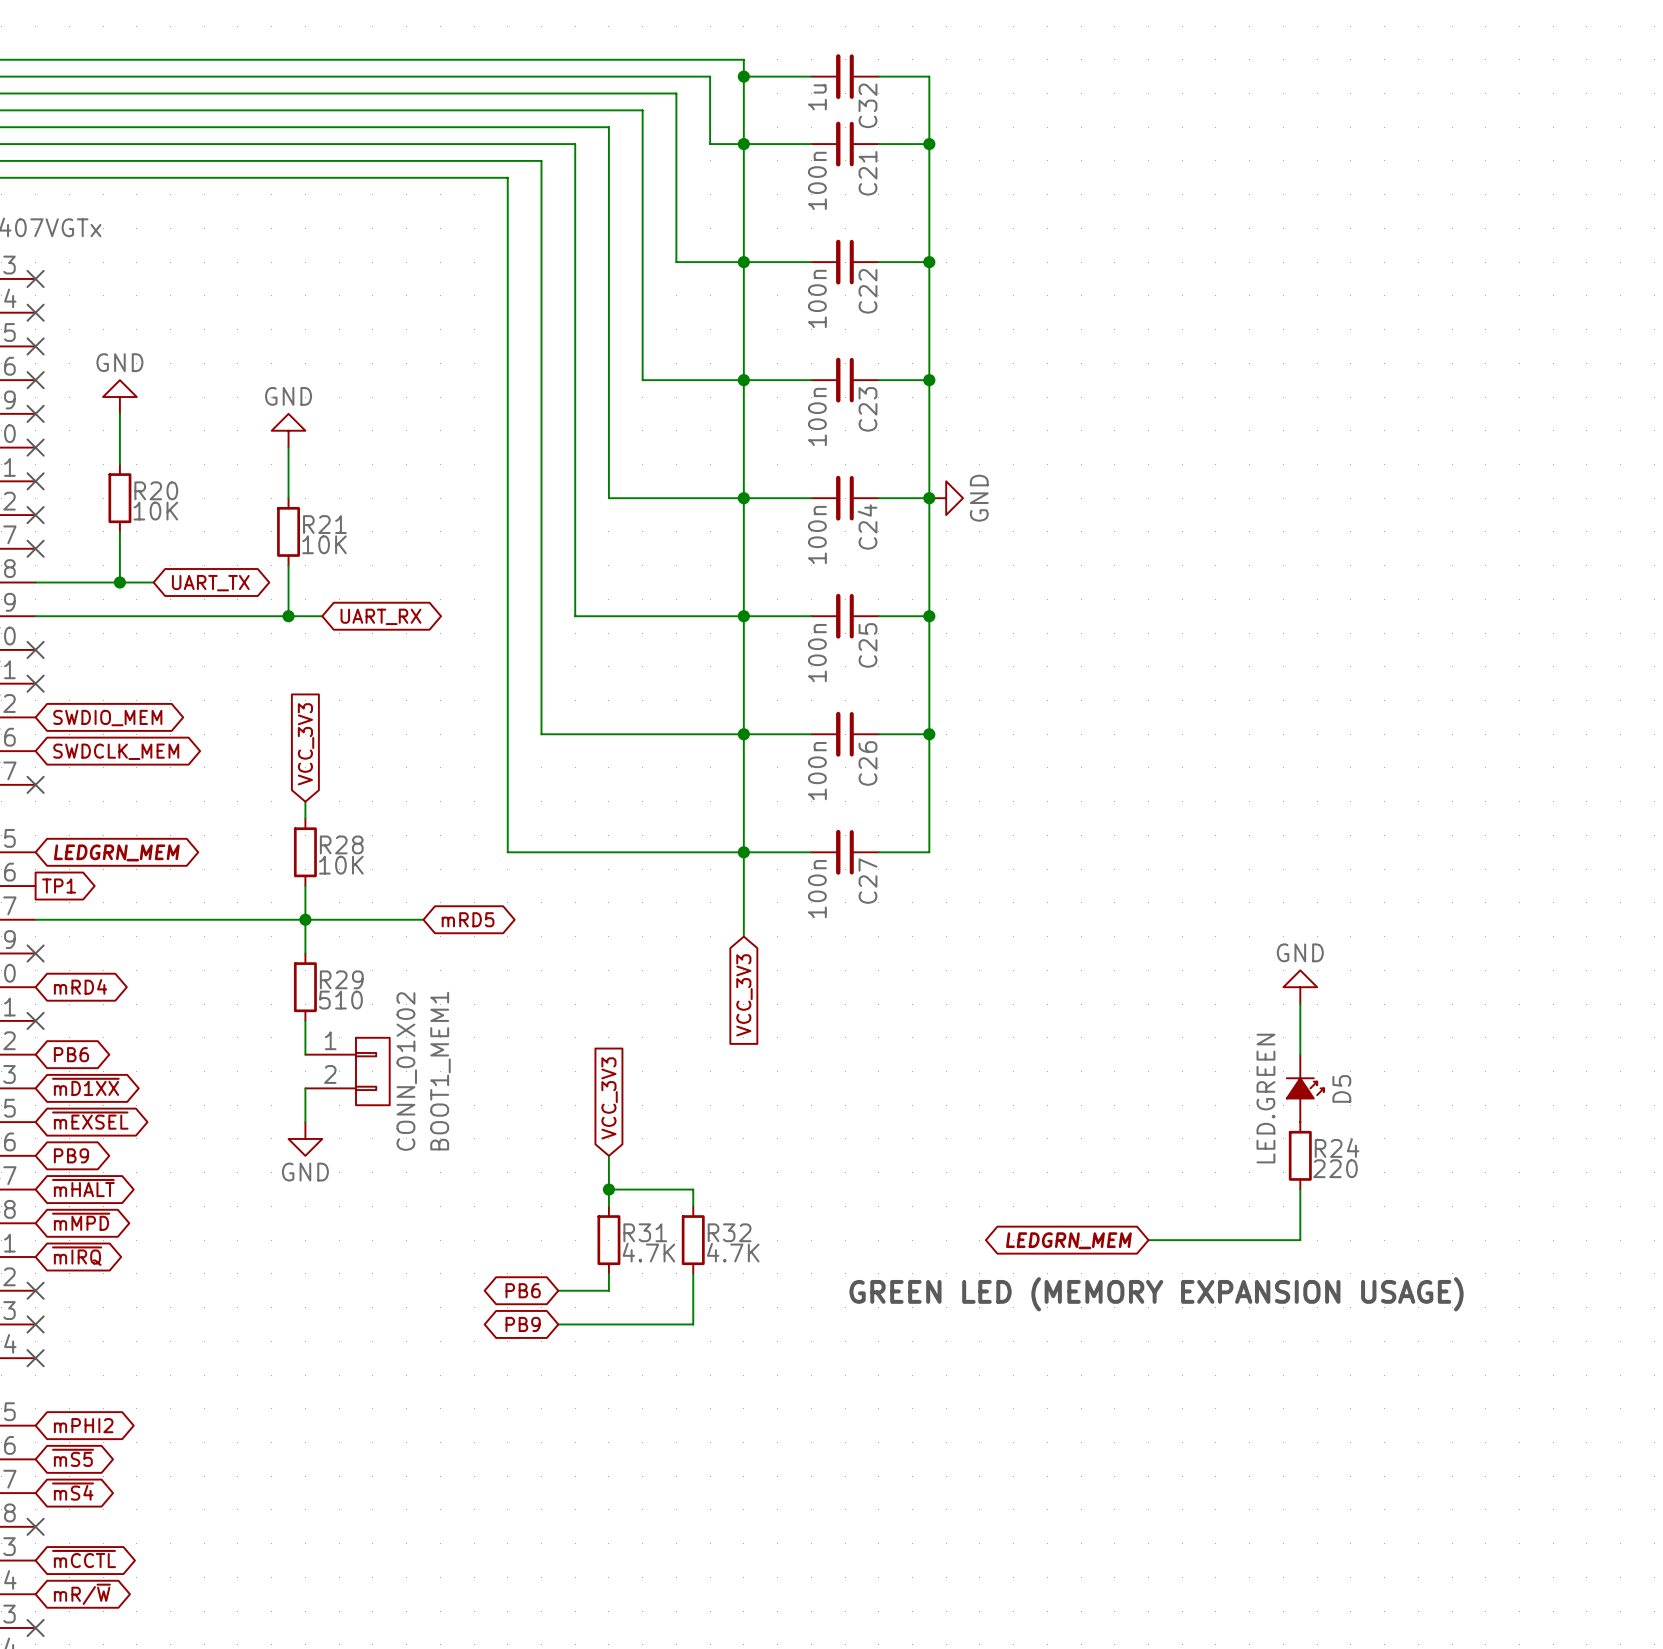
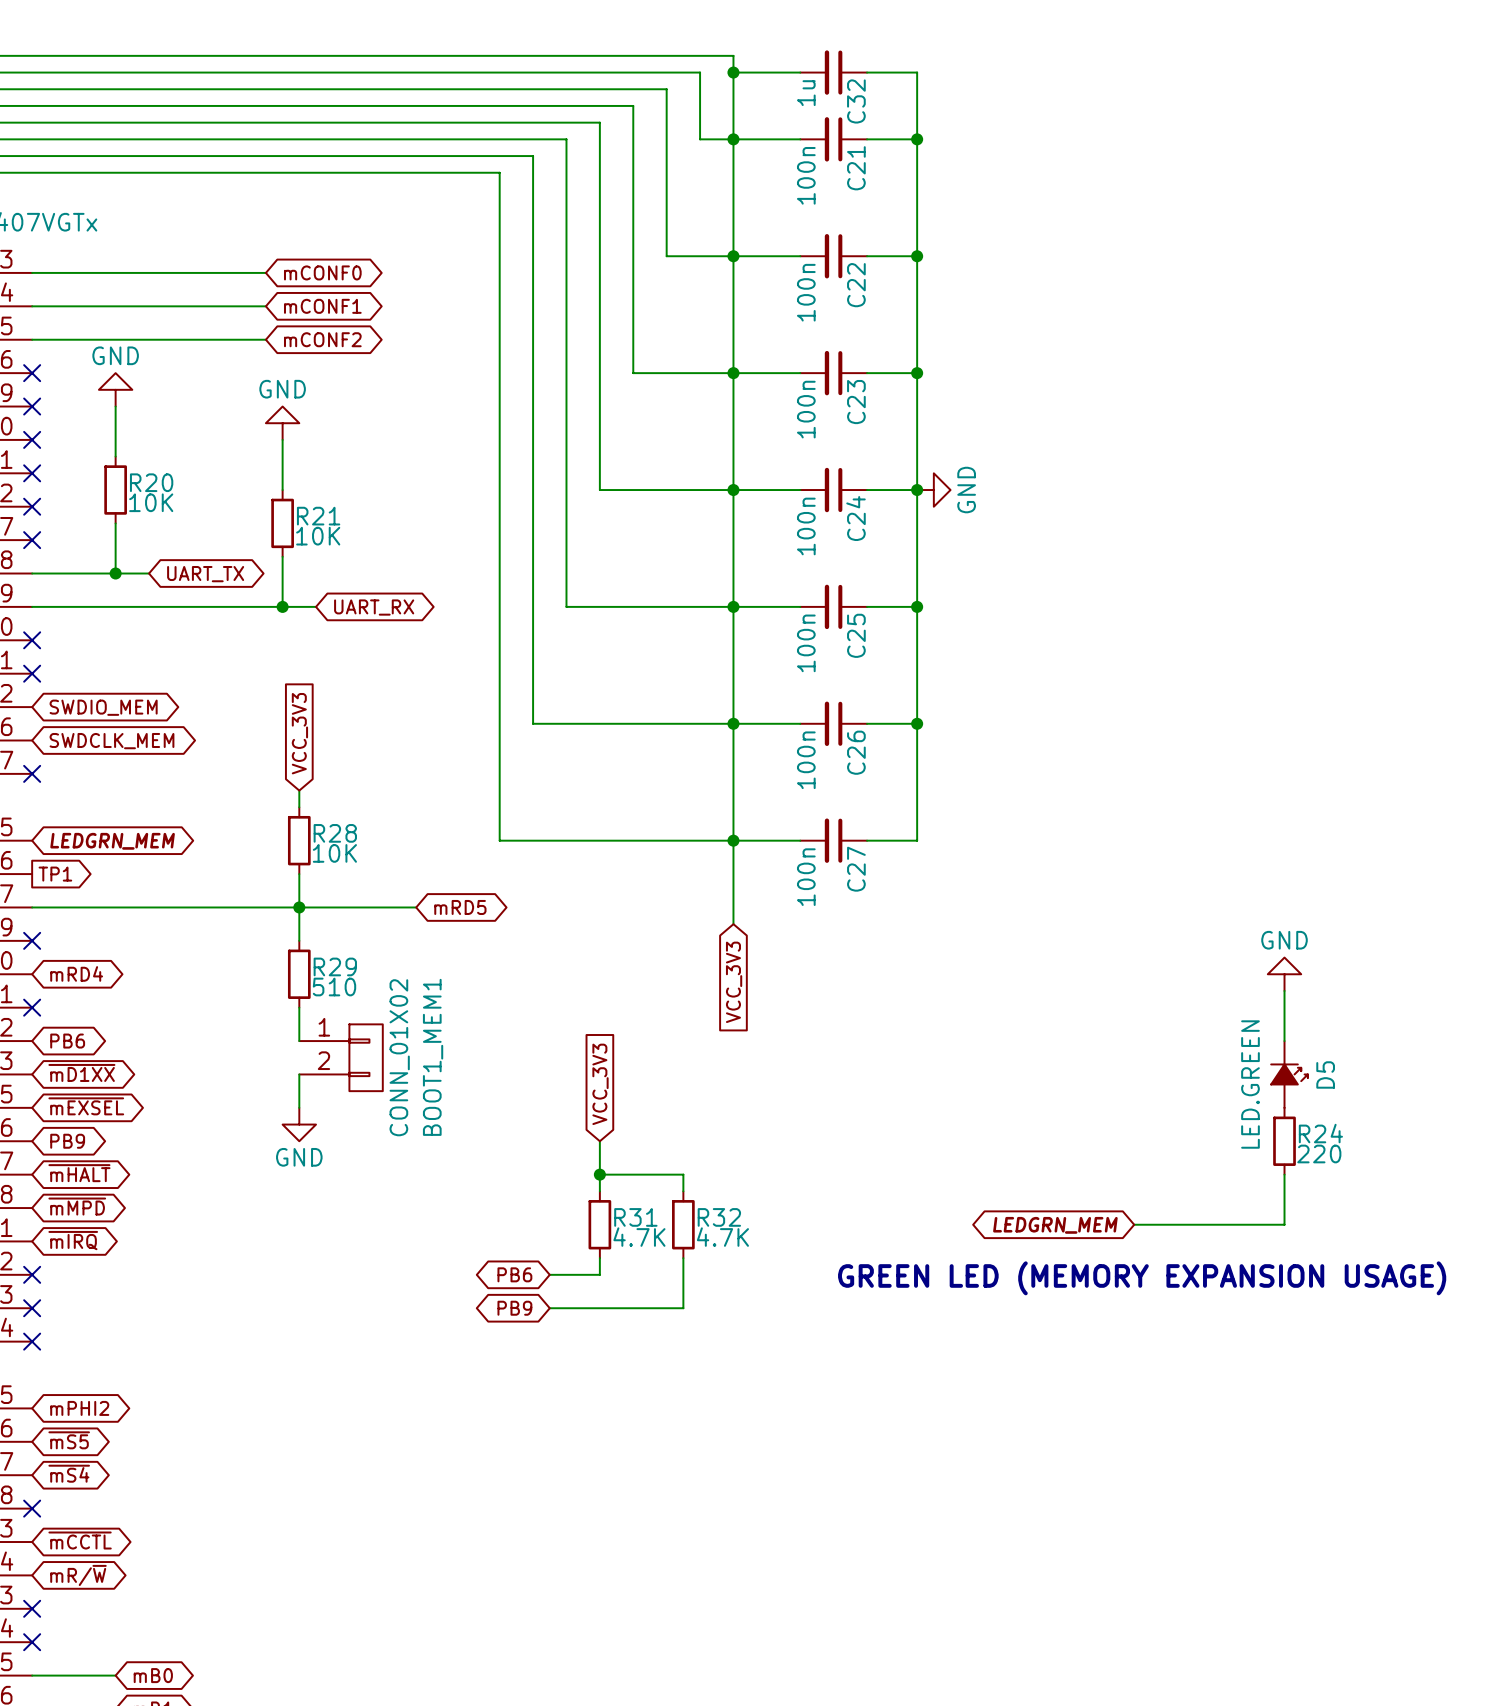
wire: none -> (32, 272) (265, 272)
no-connect mark: (35, 278) -> none
global label: none -> mCONF0 (322, 272)
wire: none -> (32, 306) (265, 306)
no-connect mark: (35, 312) -> none
global label: none -> mCONF1 (322, 306)
wire: none -> (32, 339) (265, 339)
no-connect mark: (35, 346) -> none
global label: none -> mCONF2 (322, 339)

